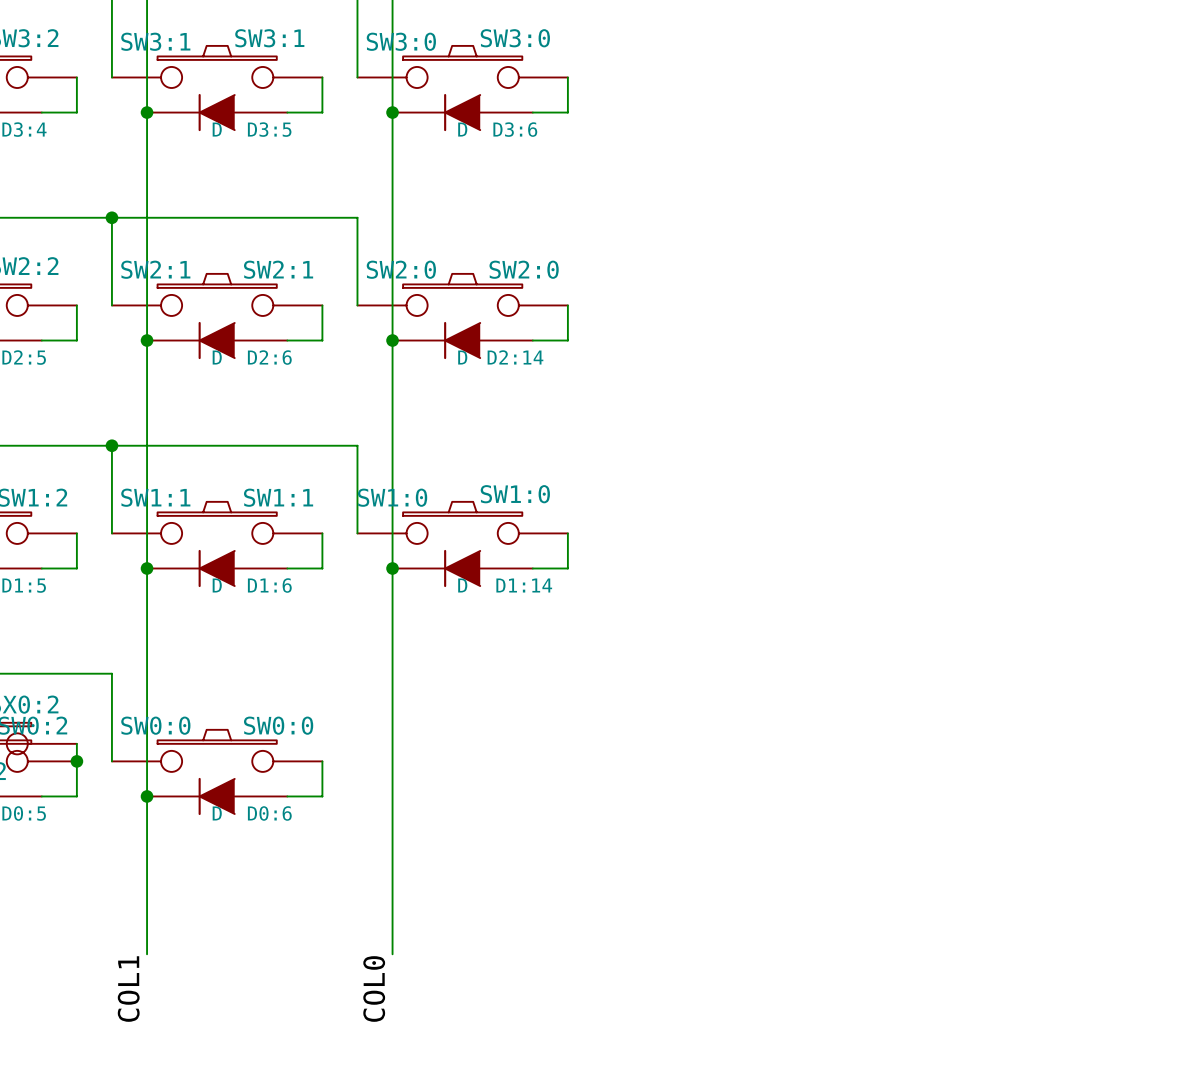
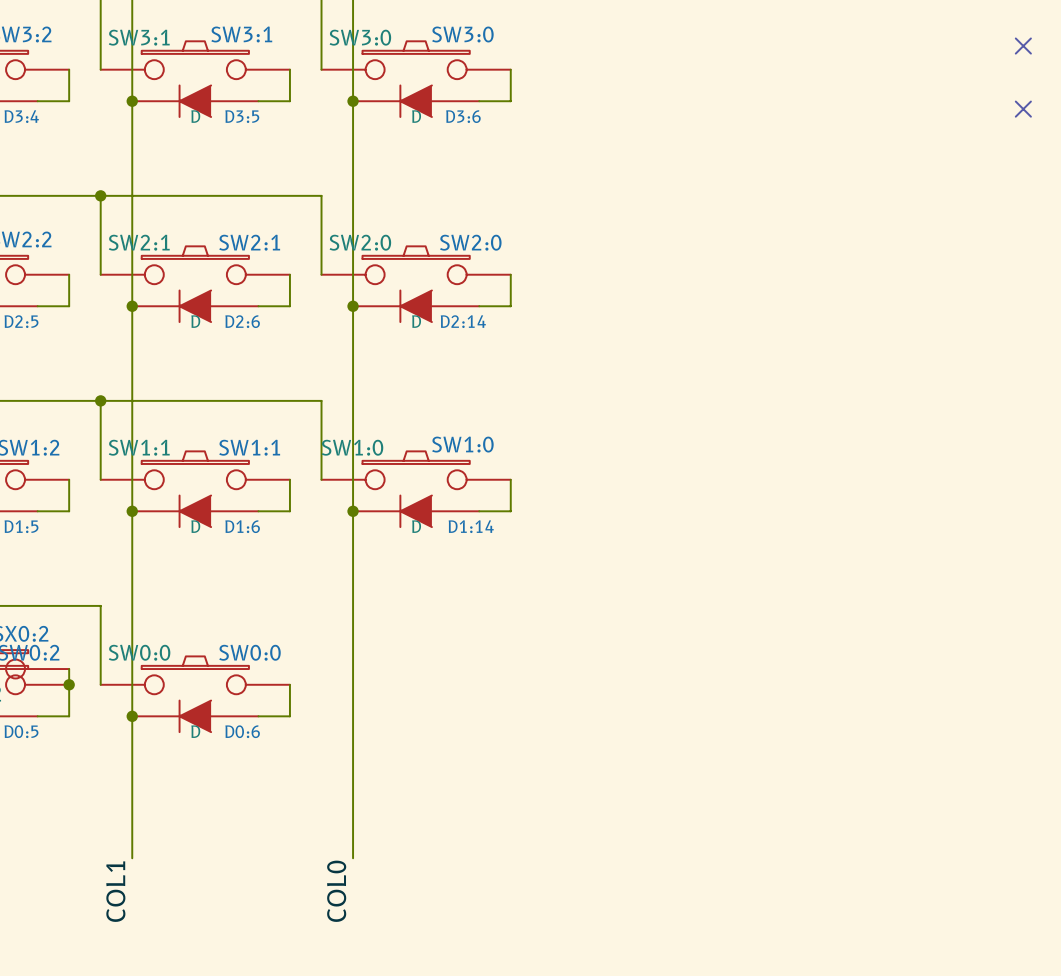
no-connect mark: none -> (1023, 46)
no-connect mark: none -> (1023, 109)

